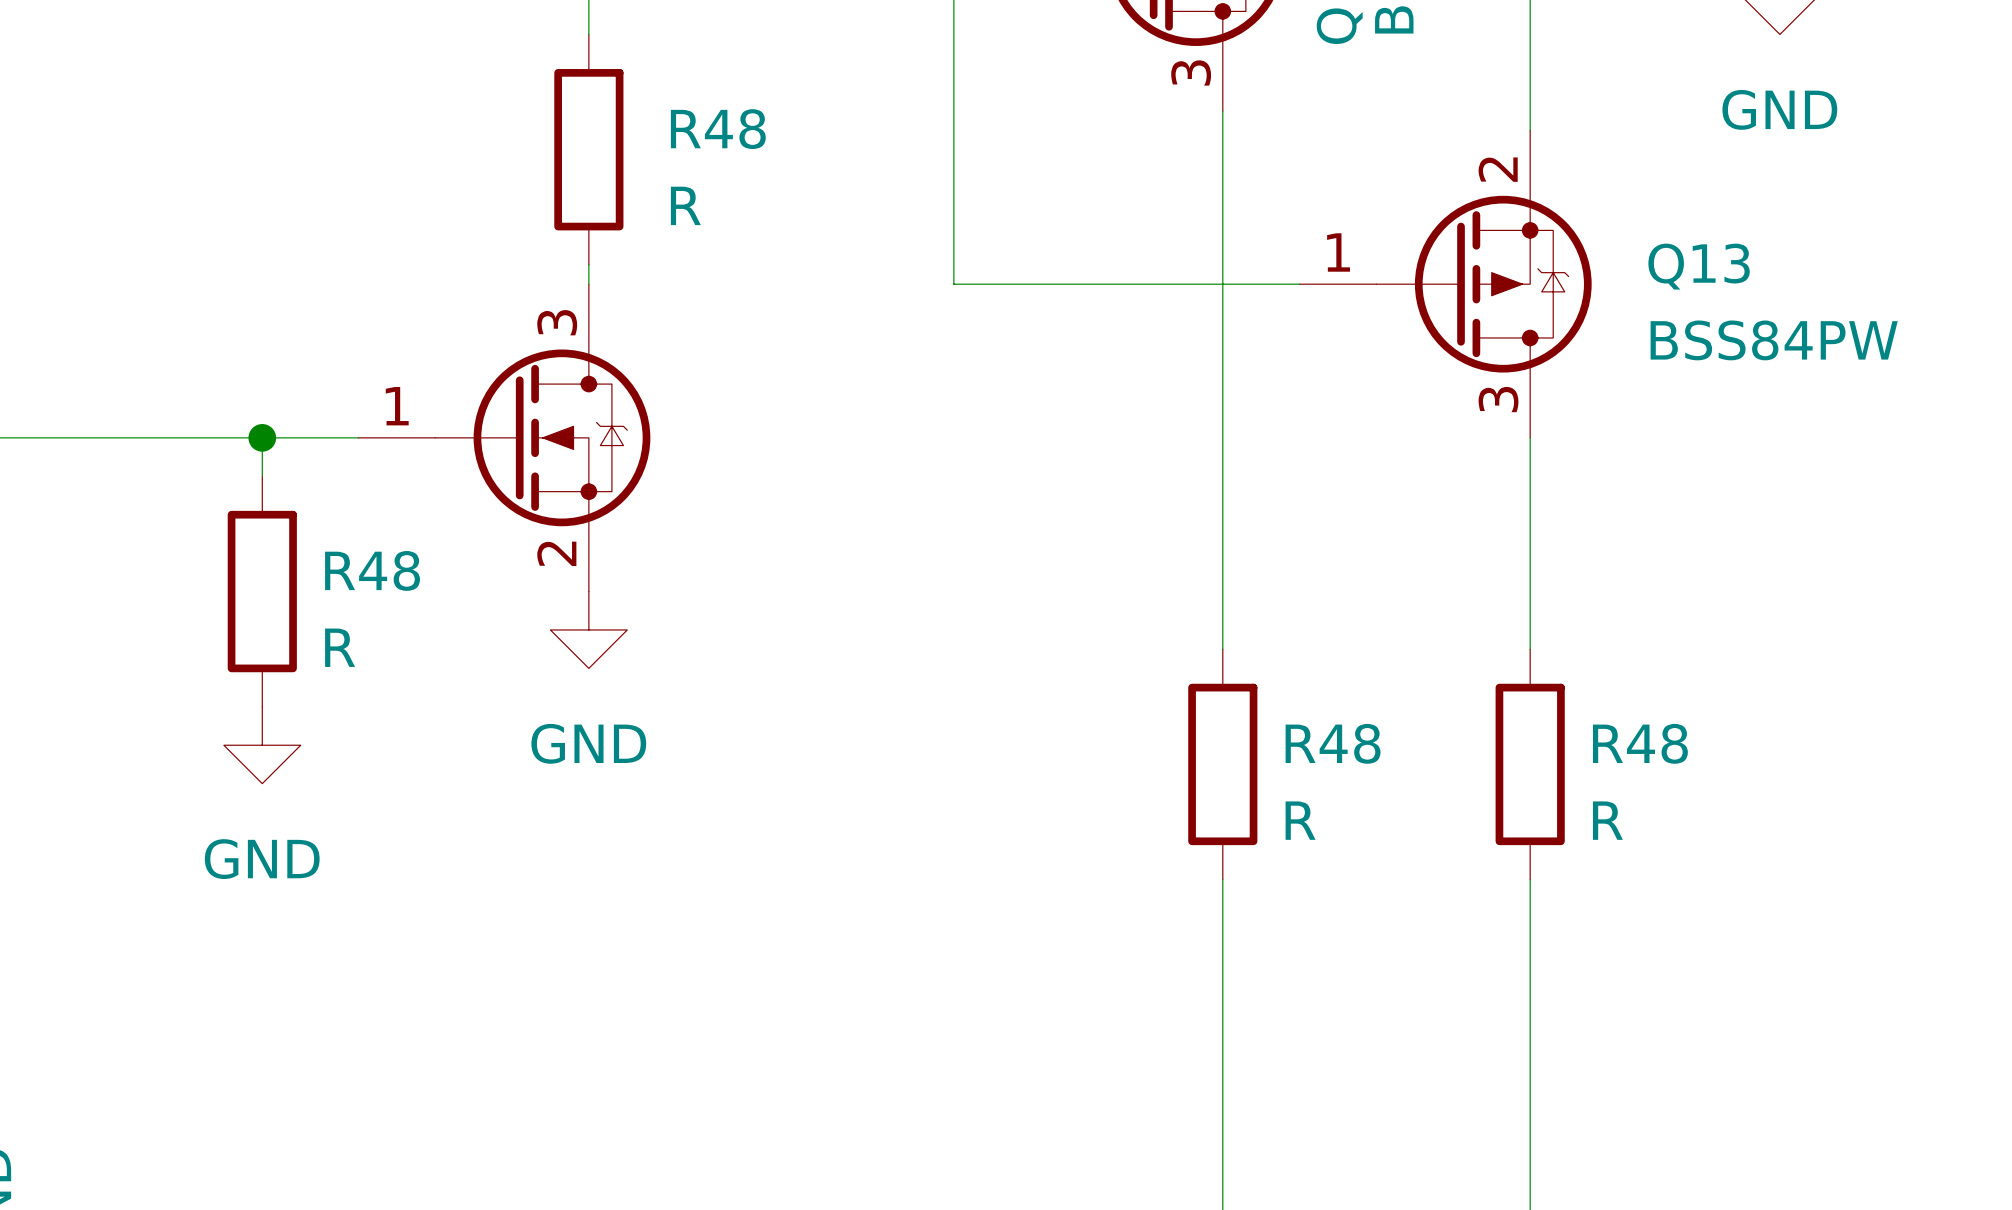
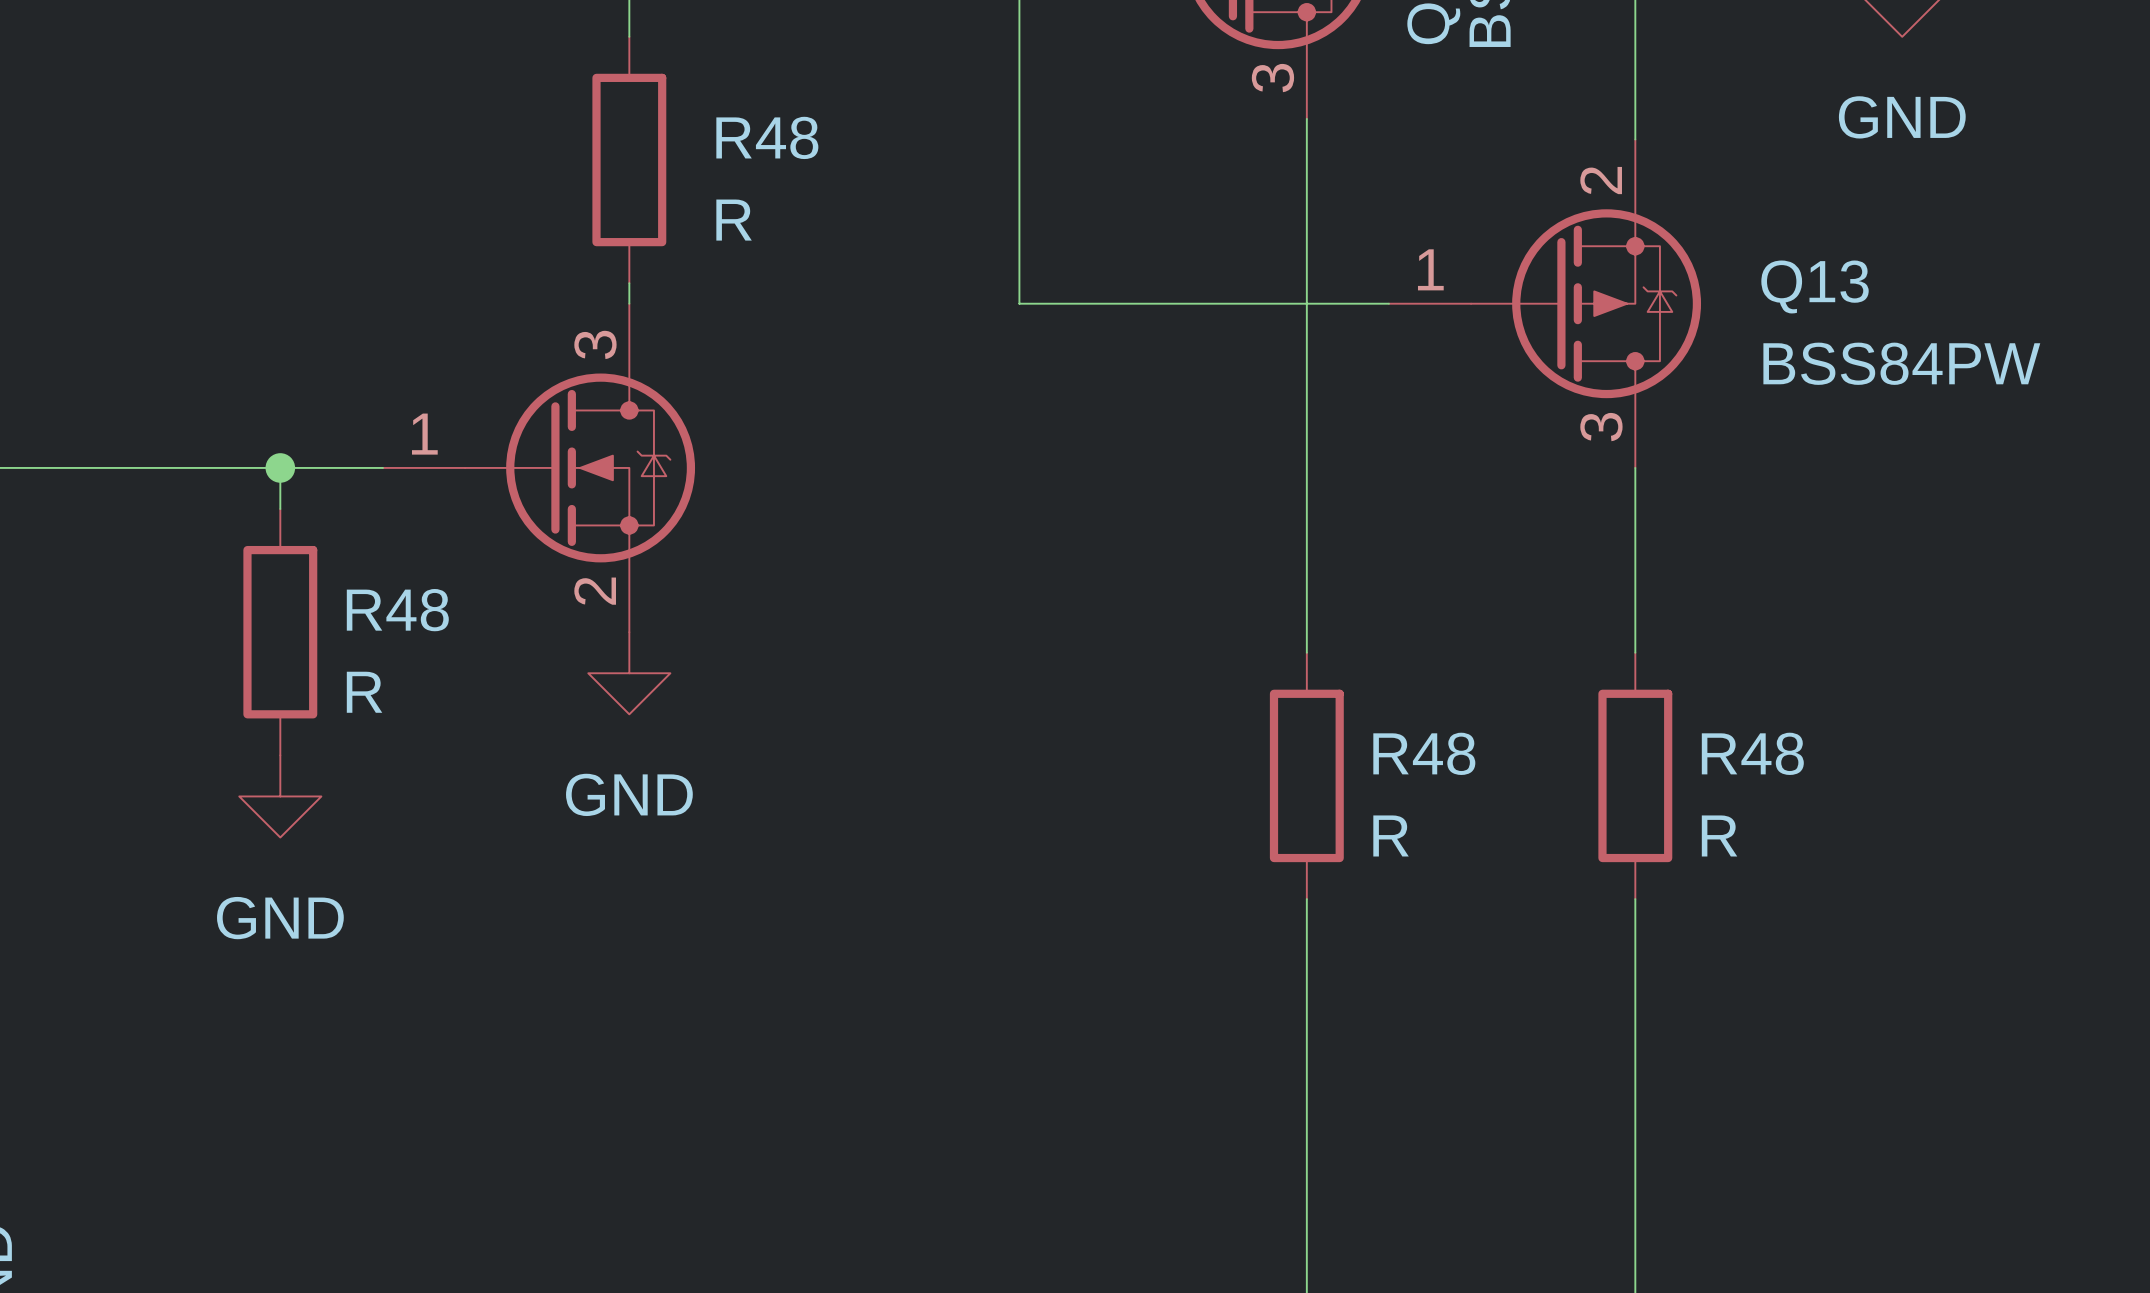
R48 position: (1222, 764) -> (1306, 775)
R48 position: (1530, 764) -> (1635, 775)

